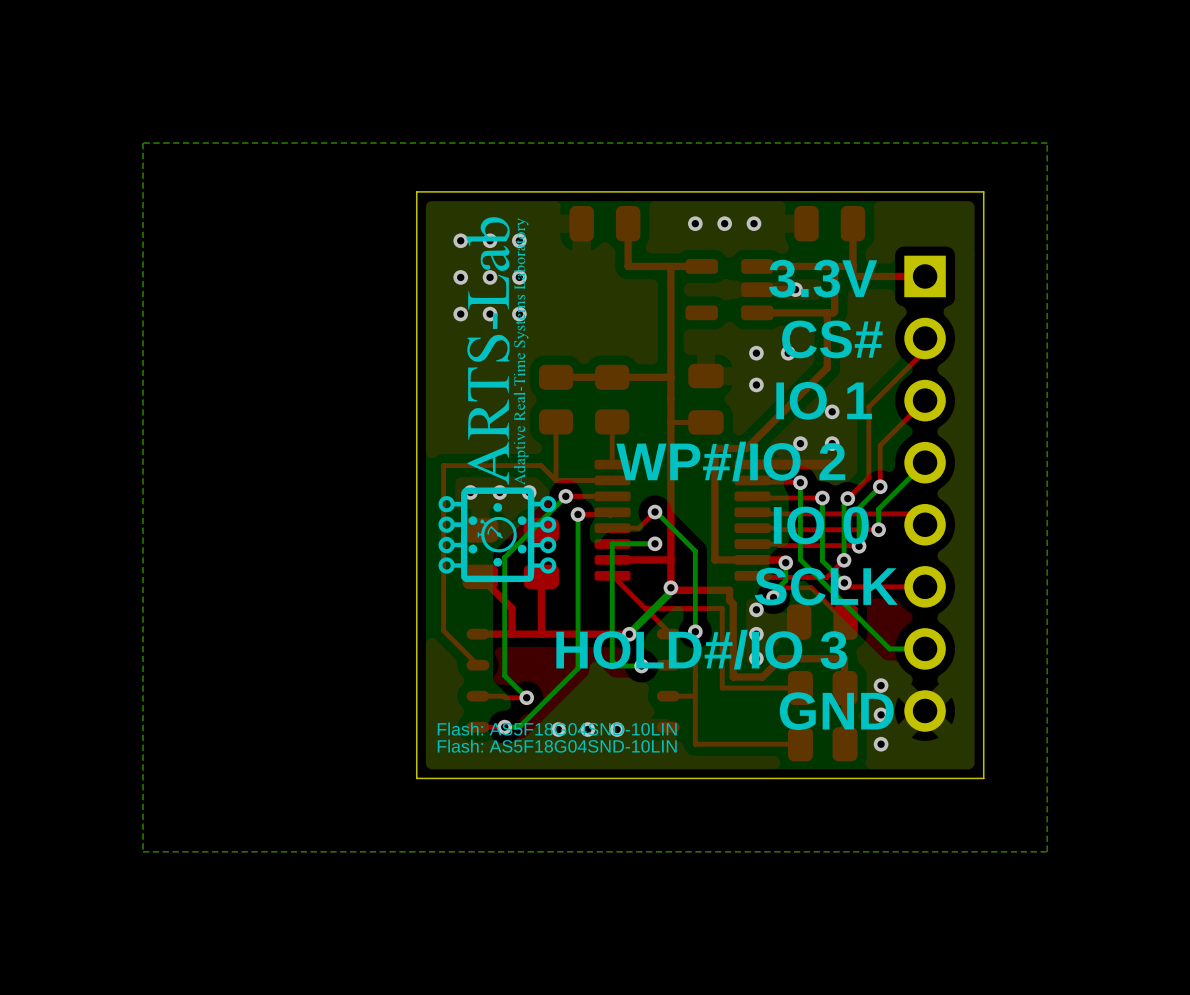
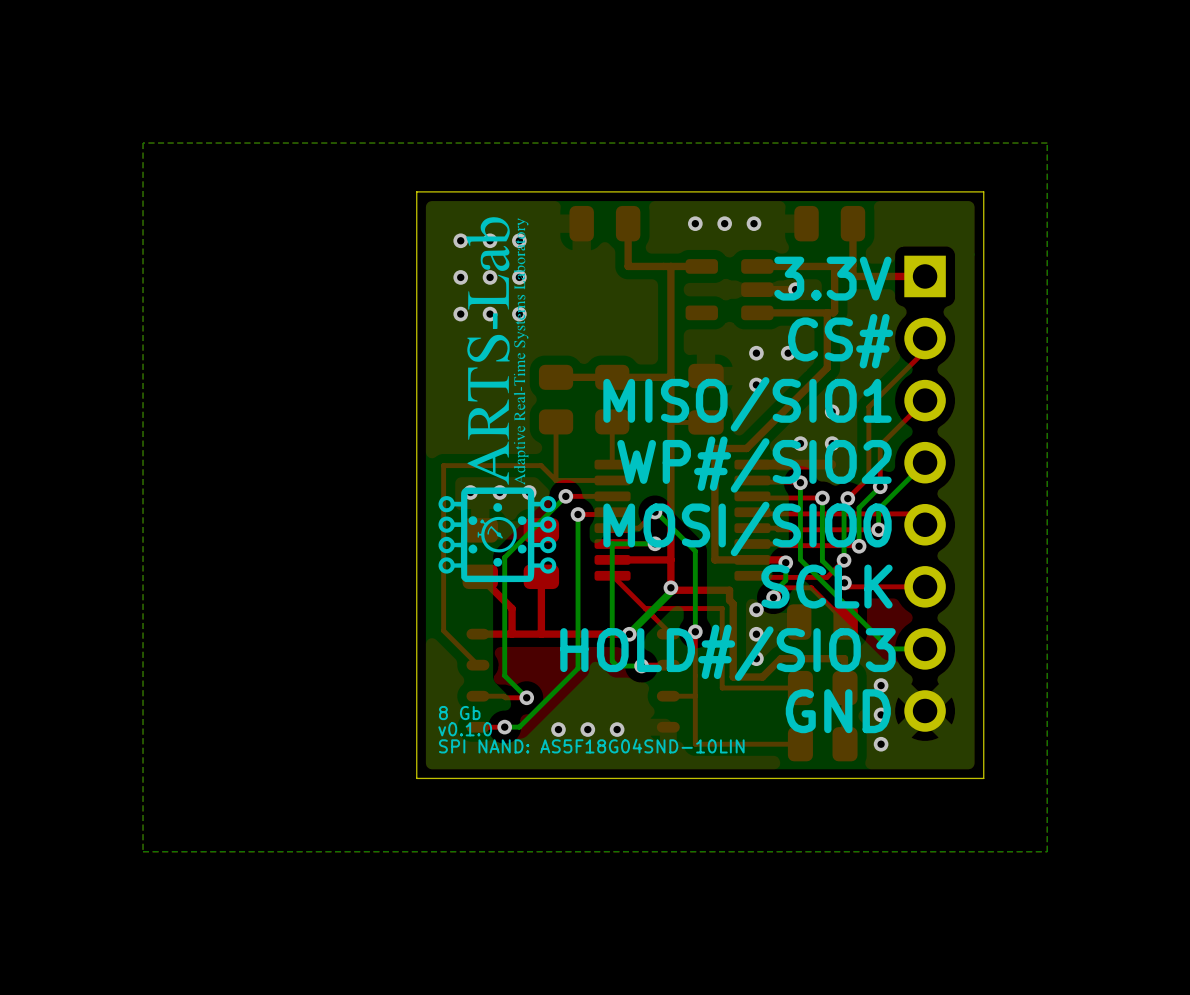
text: none -> MISO/SIO1 (747, 404)
text: IO 1 (824, 400) -> none
text: WP#/IO 2 (730, 461) -> WP#/SIO2 (754, 464)
text: none -> MOSI/SIO0 (747, 528)
text: IO 0 (821, 525) -> none
text: HOLD#/IO 3 (701, 649) -> HOLD#/SIO3 (728, 652)
text: none -> 8 Gb (459, 713)
text: Flash: AS5F18G04SND-10LIN (557, 729) -> v0.1.0 (465, 729)
text: Flash: AS5F18G04SND-10LIN (557, 746) -> SPI NAND: AS5F18G04SND-10LIN (591, 746)

